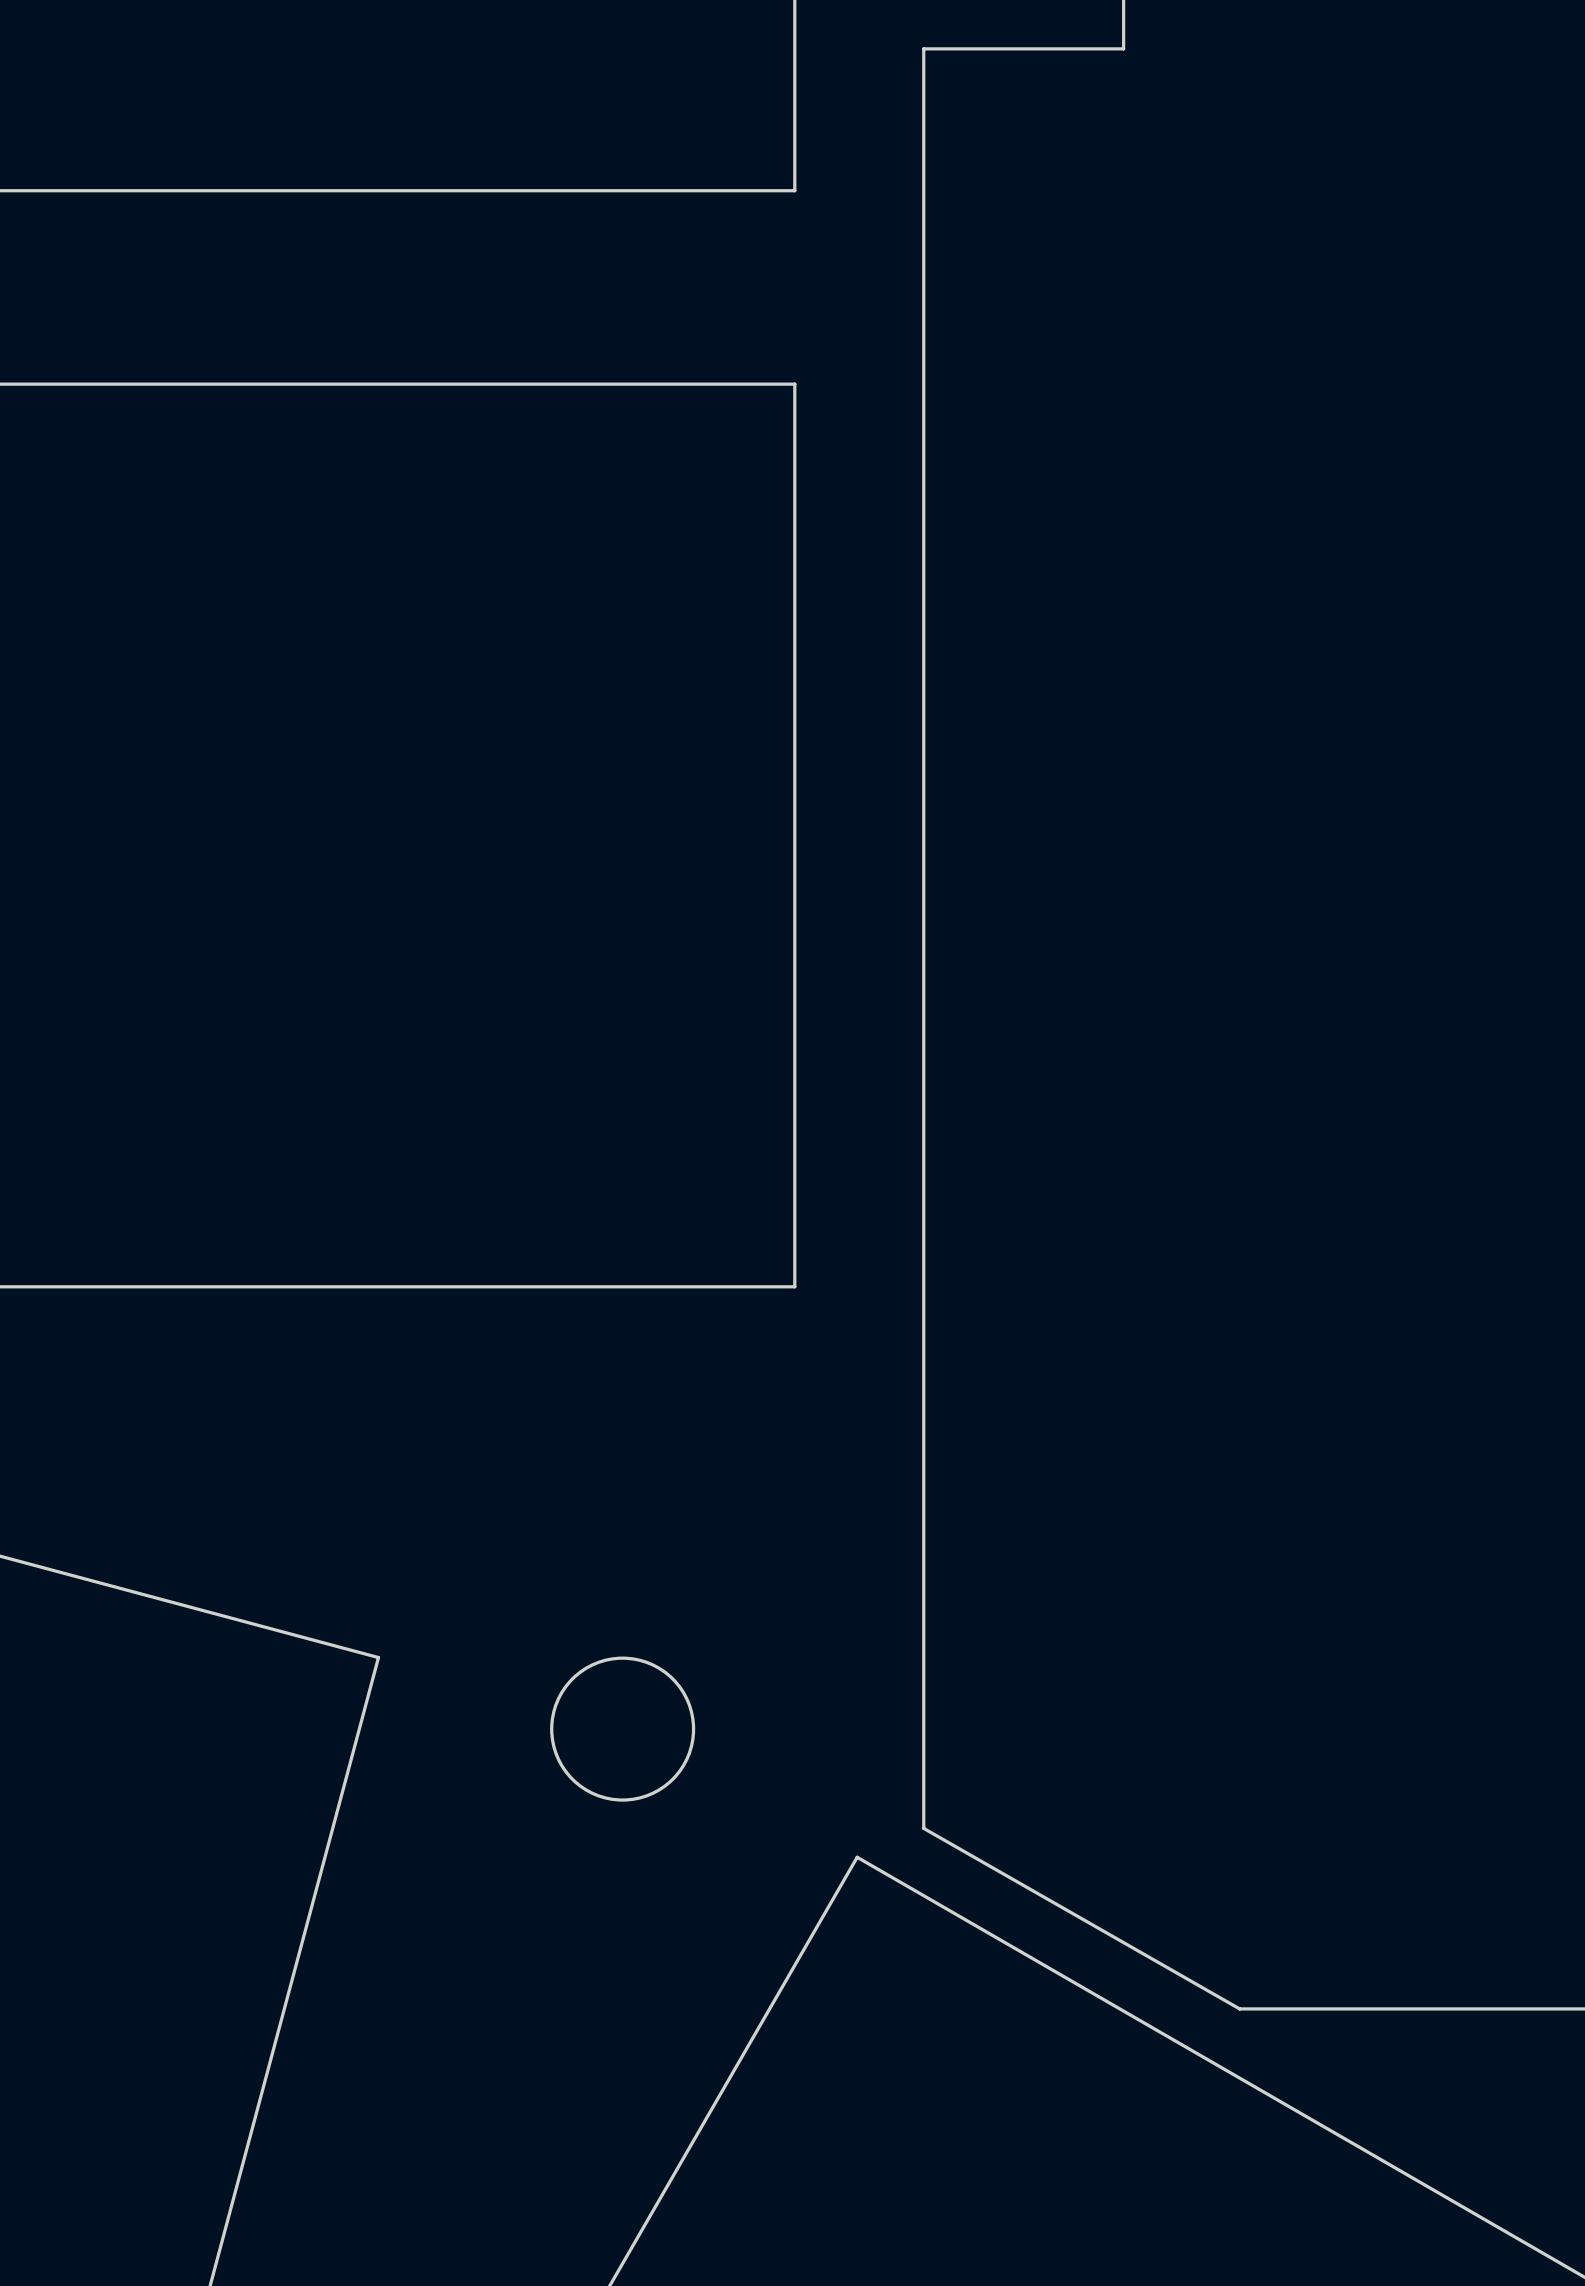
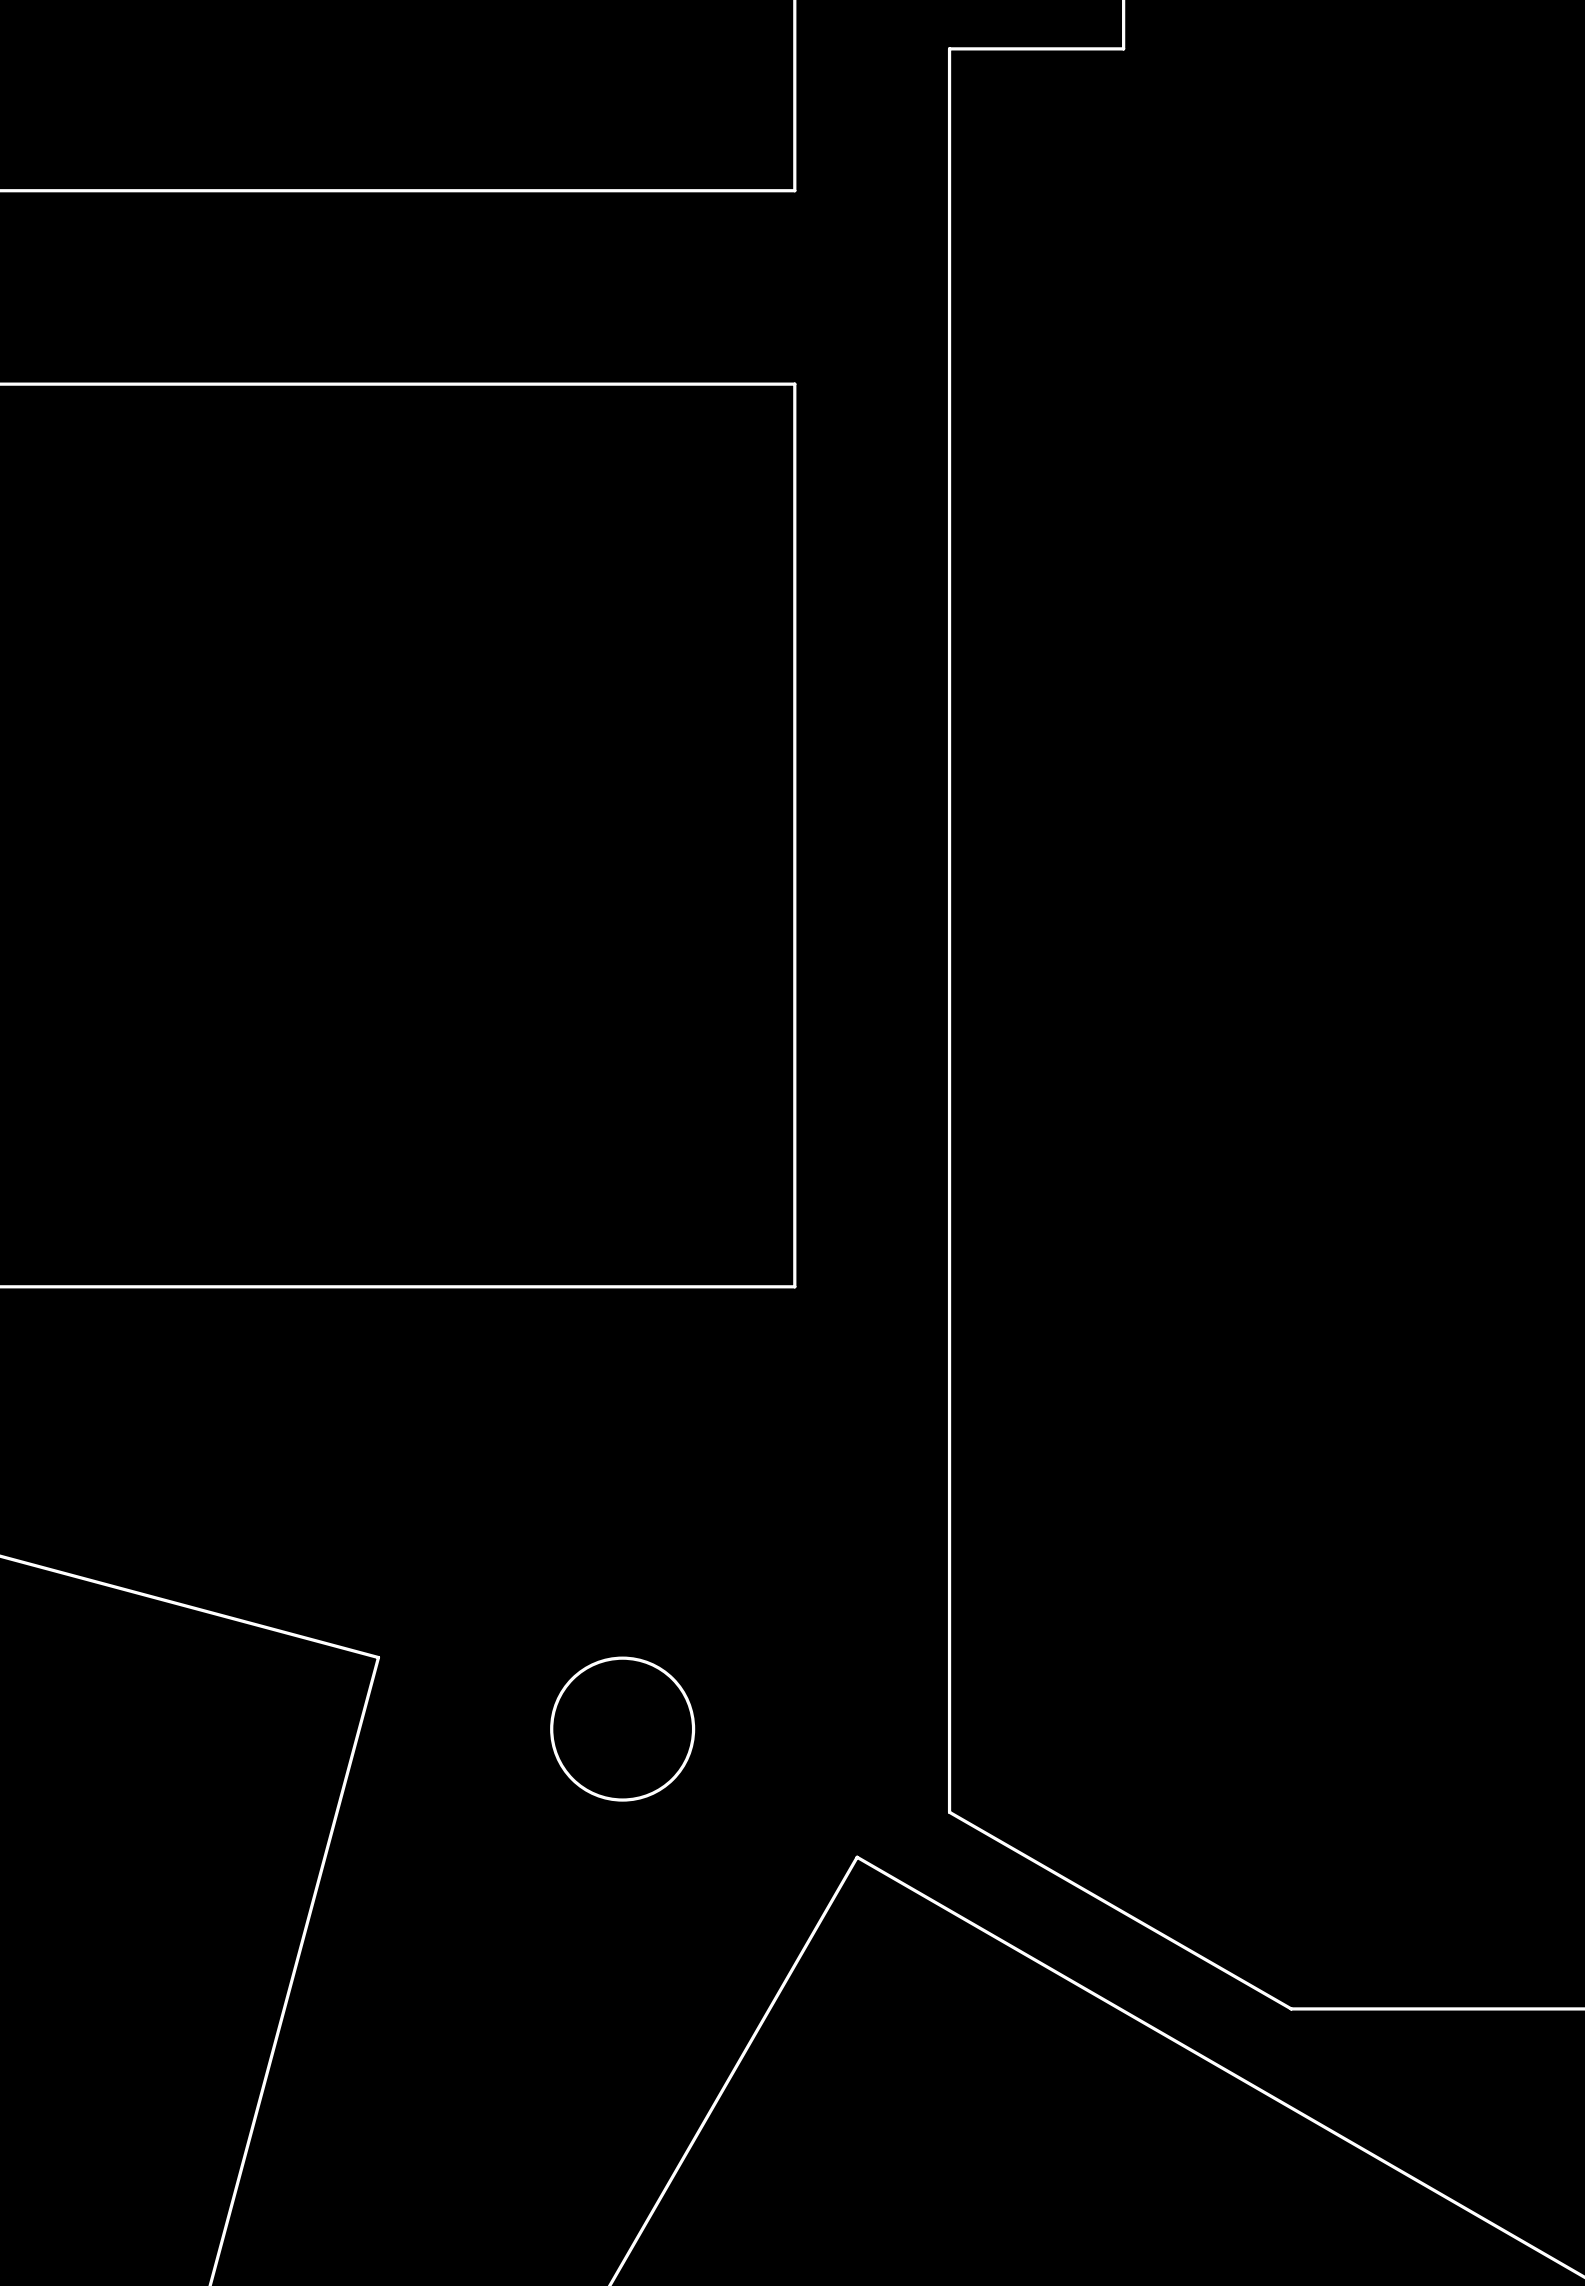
board edge: (949, 48) (923, 48) (923, 1828) (1239, 2008) (1291, 2008) -> (949, 48) (949, 1812) (1291, 2008)

